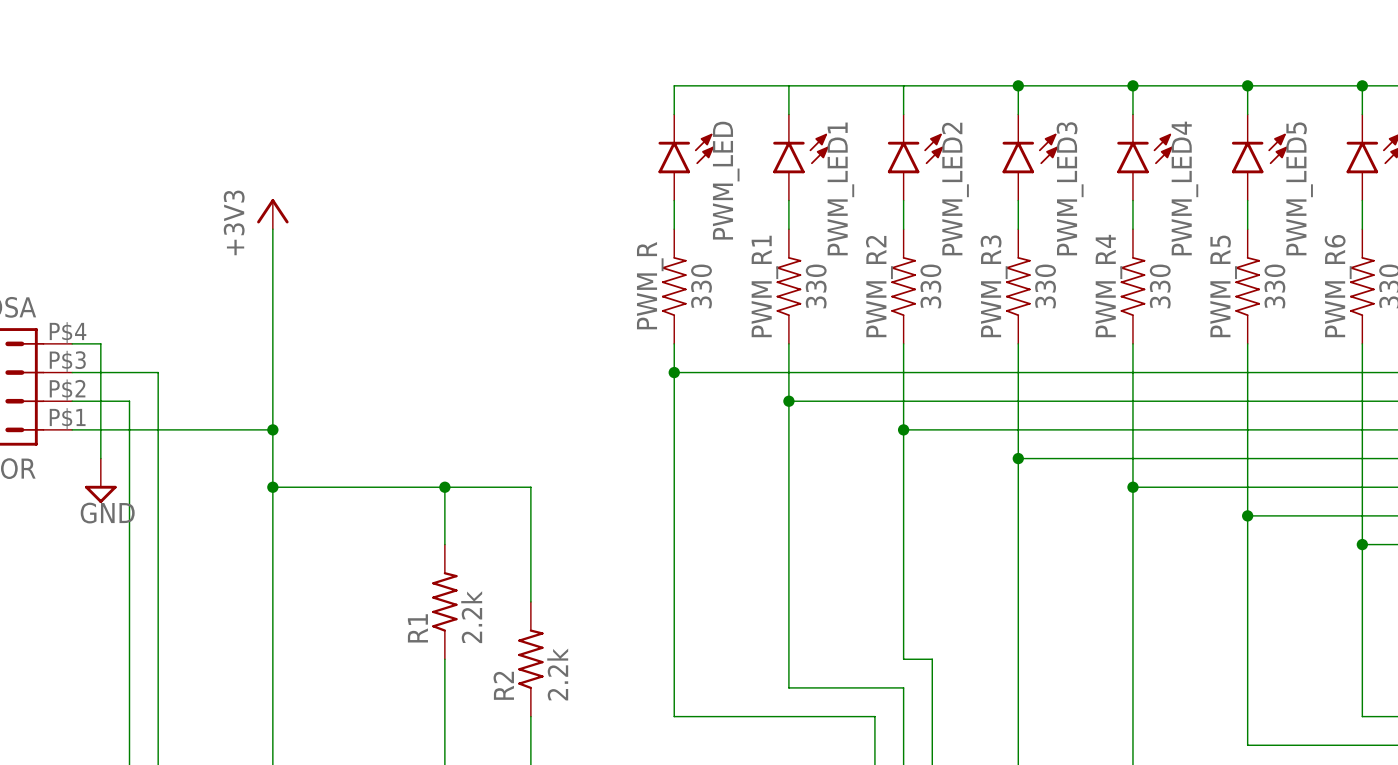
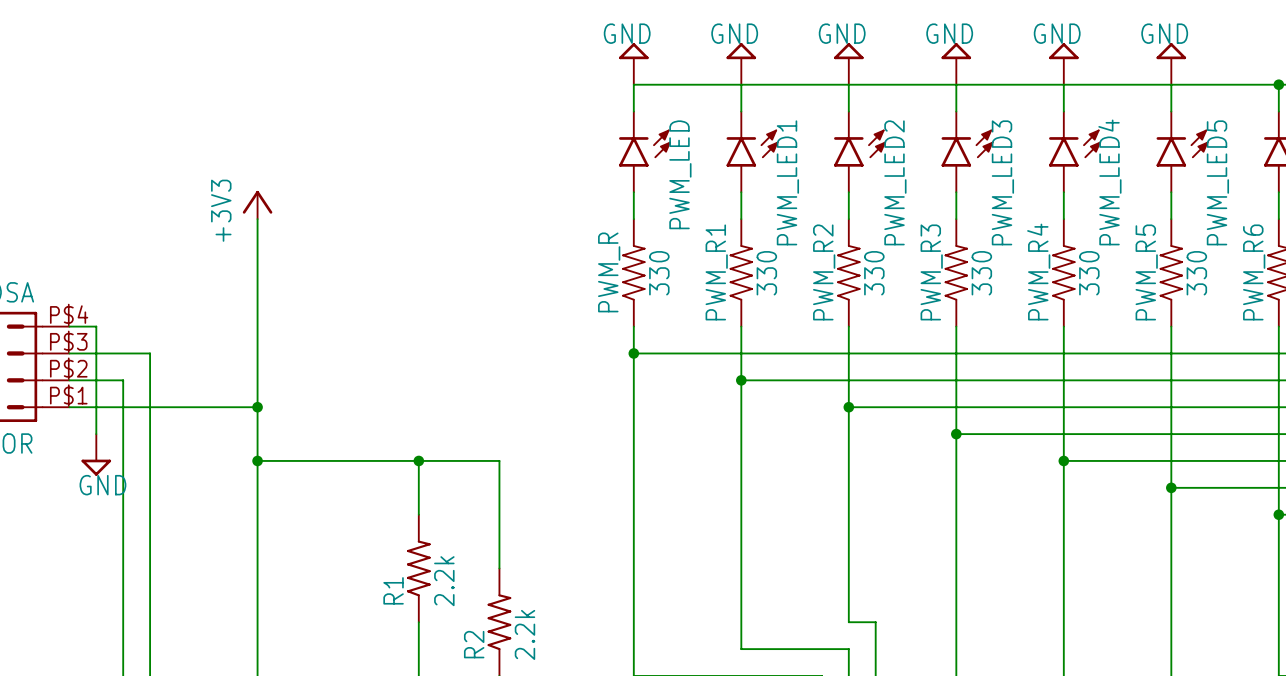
power symbol: none -> GND (633, 63)
power symbol: none -> GND (741, 63)
power symbol: none -> GND (848, 63)
power symbol: none -> GND (956, 63)
power symbol: none -> GND (1063, 63)
power symbol: none -> GND (1171, 63)
junction: (1018, 85) -> none
junction: (1132, 85) -> none
junction: (1247, 85) -> none

